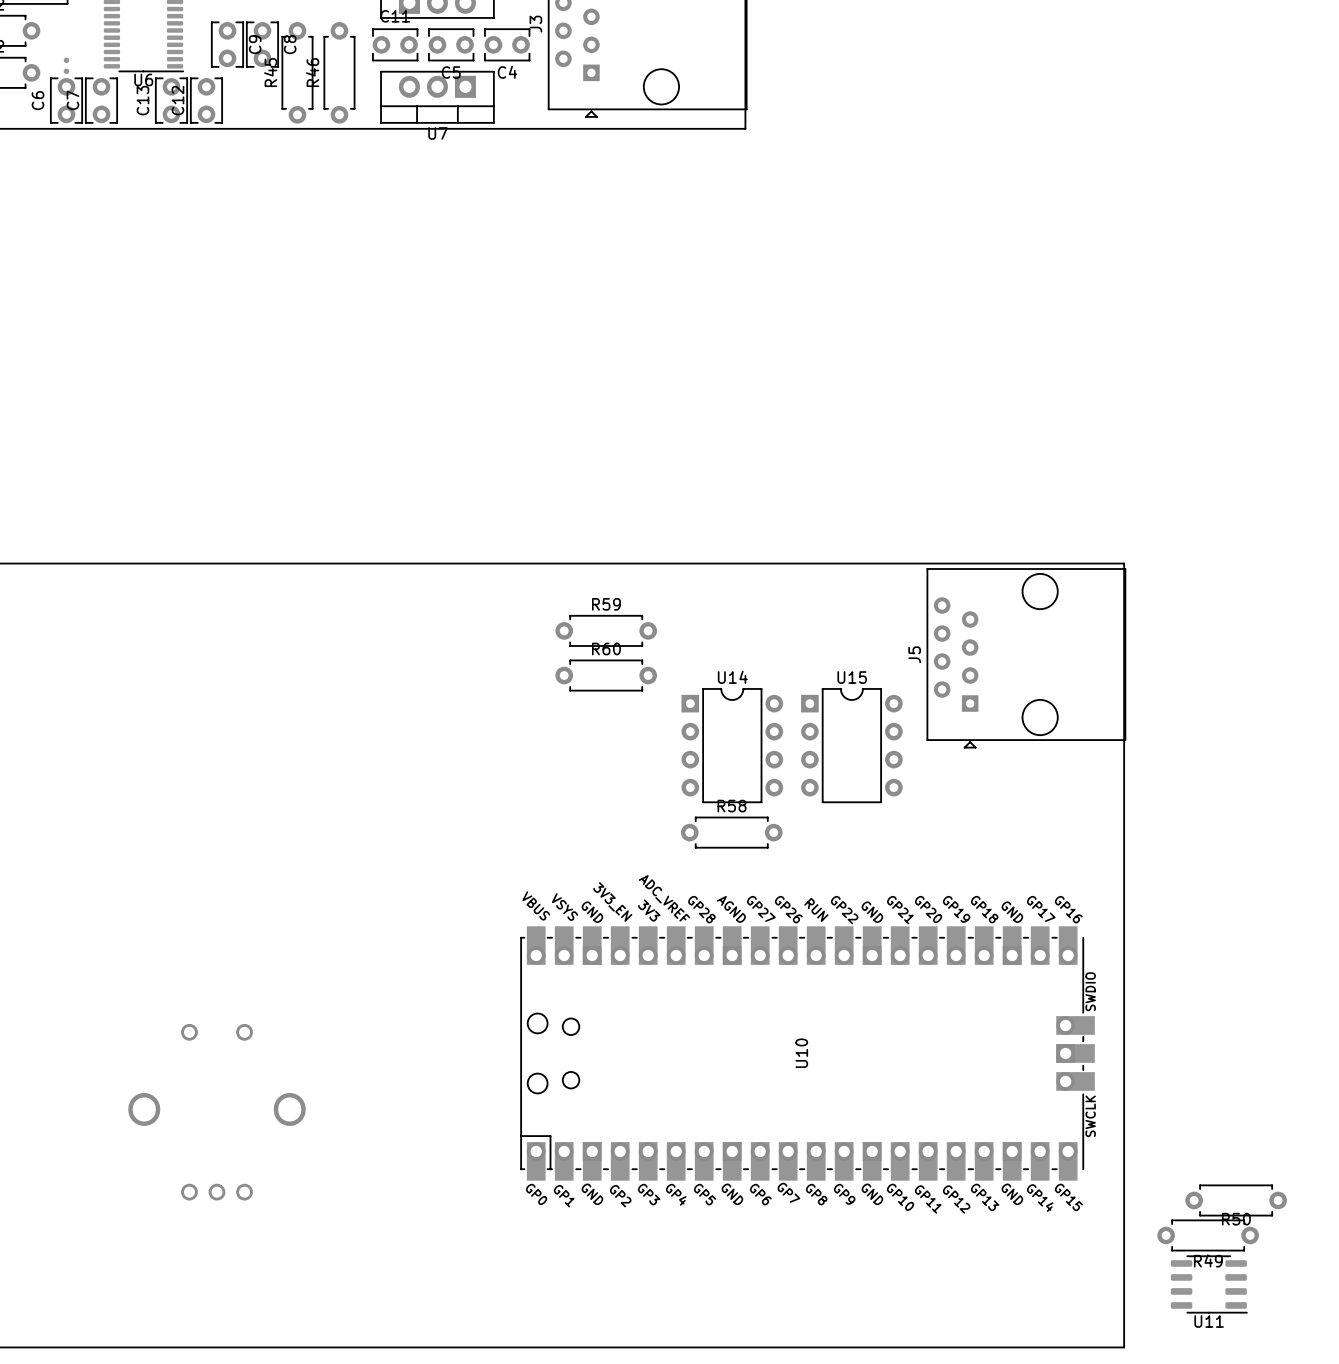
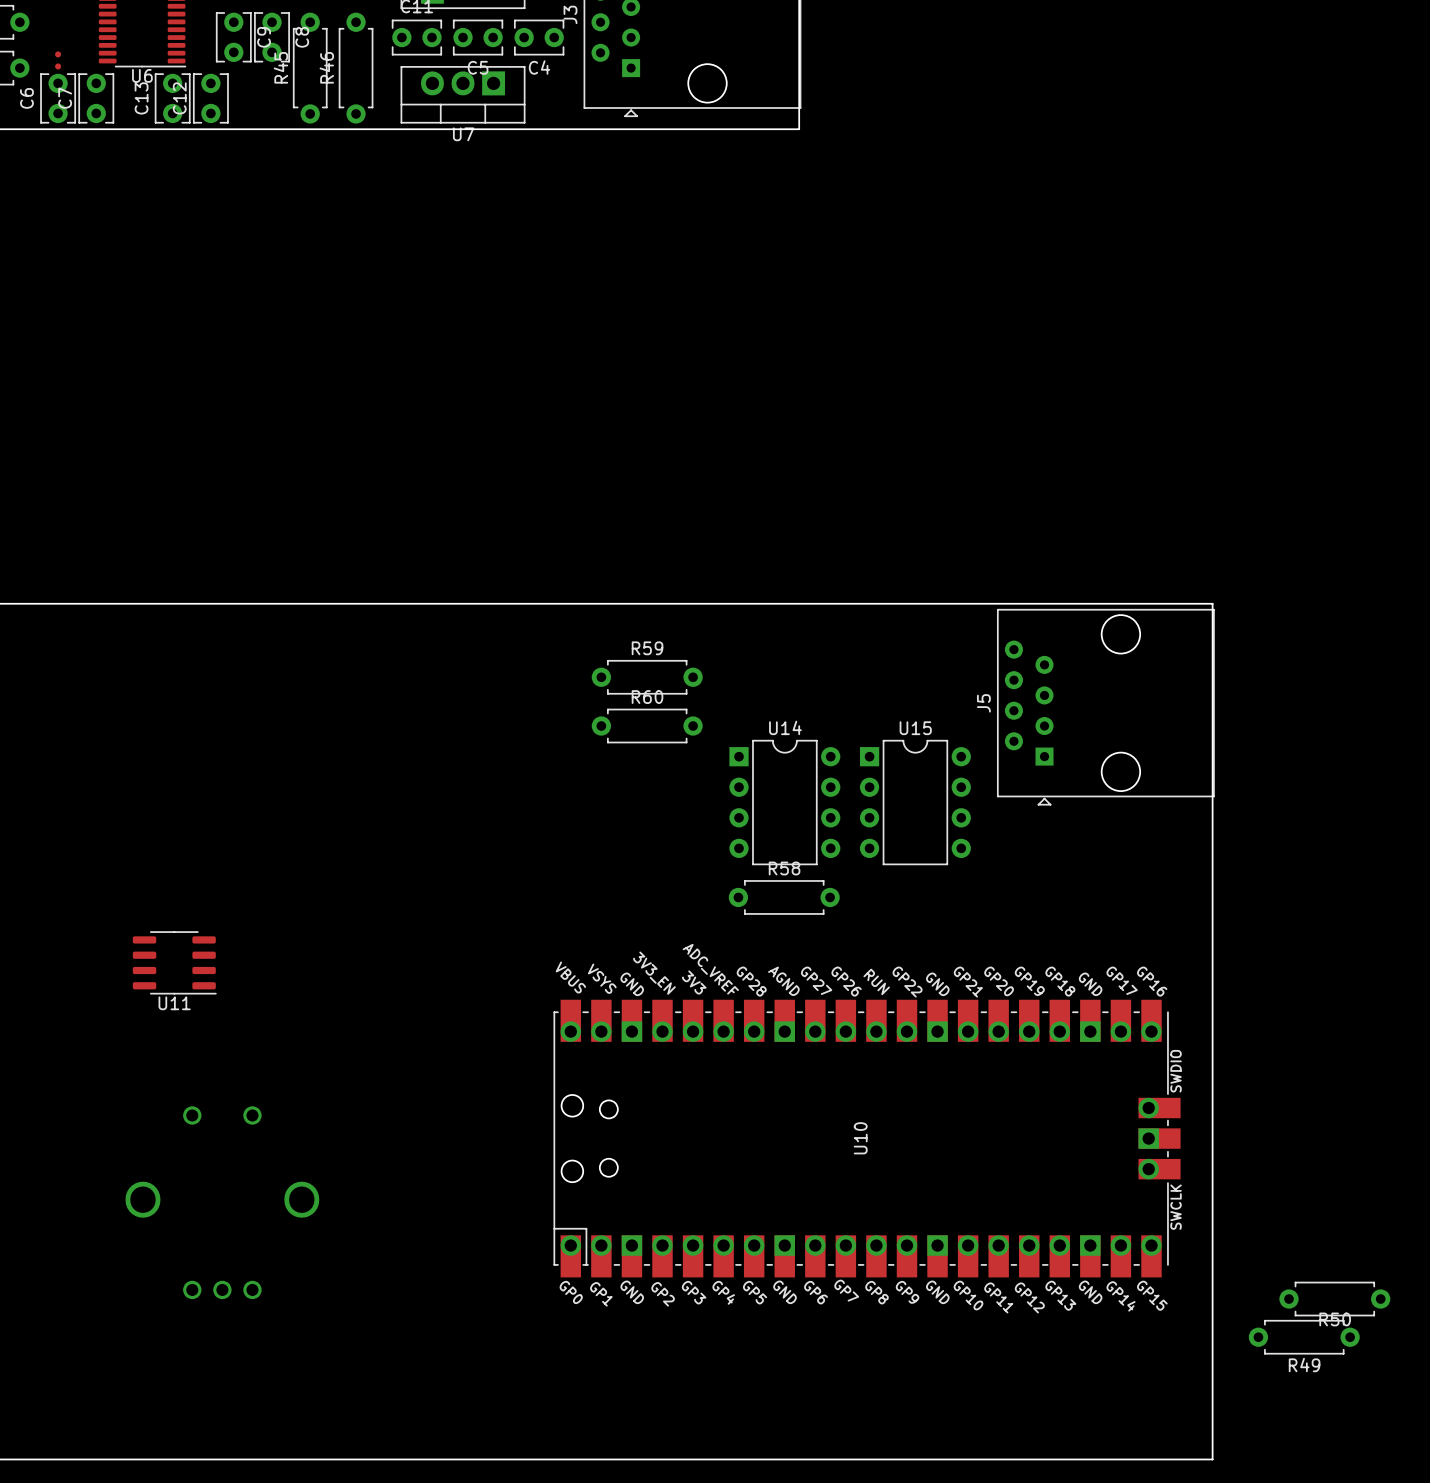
U11 position: (1209, 1284) -> (174, 962)

